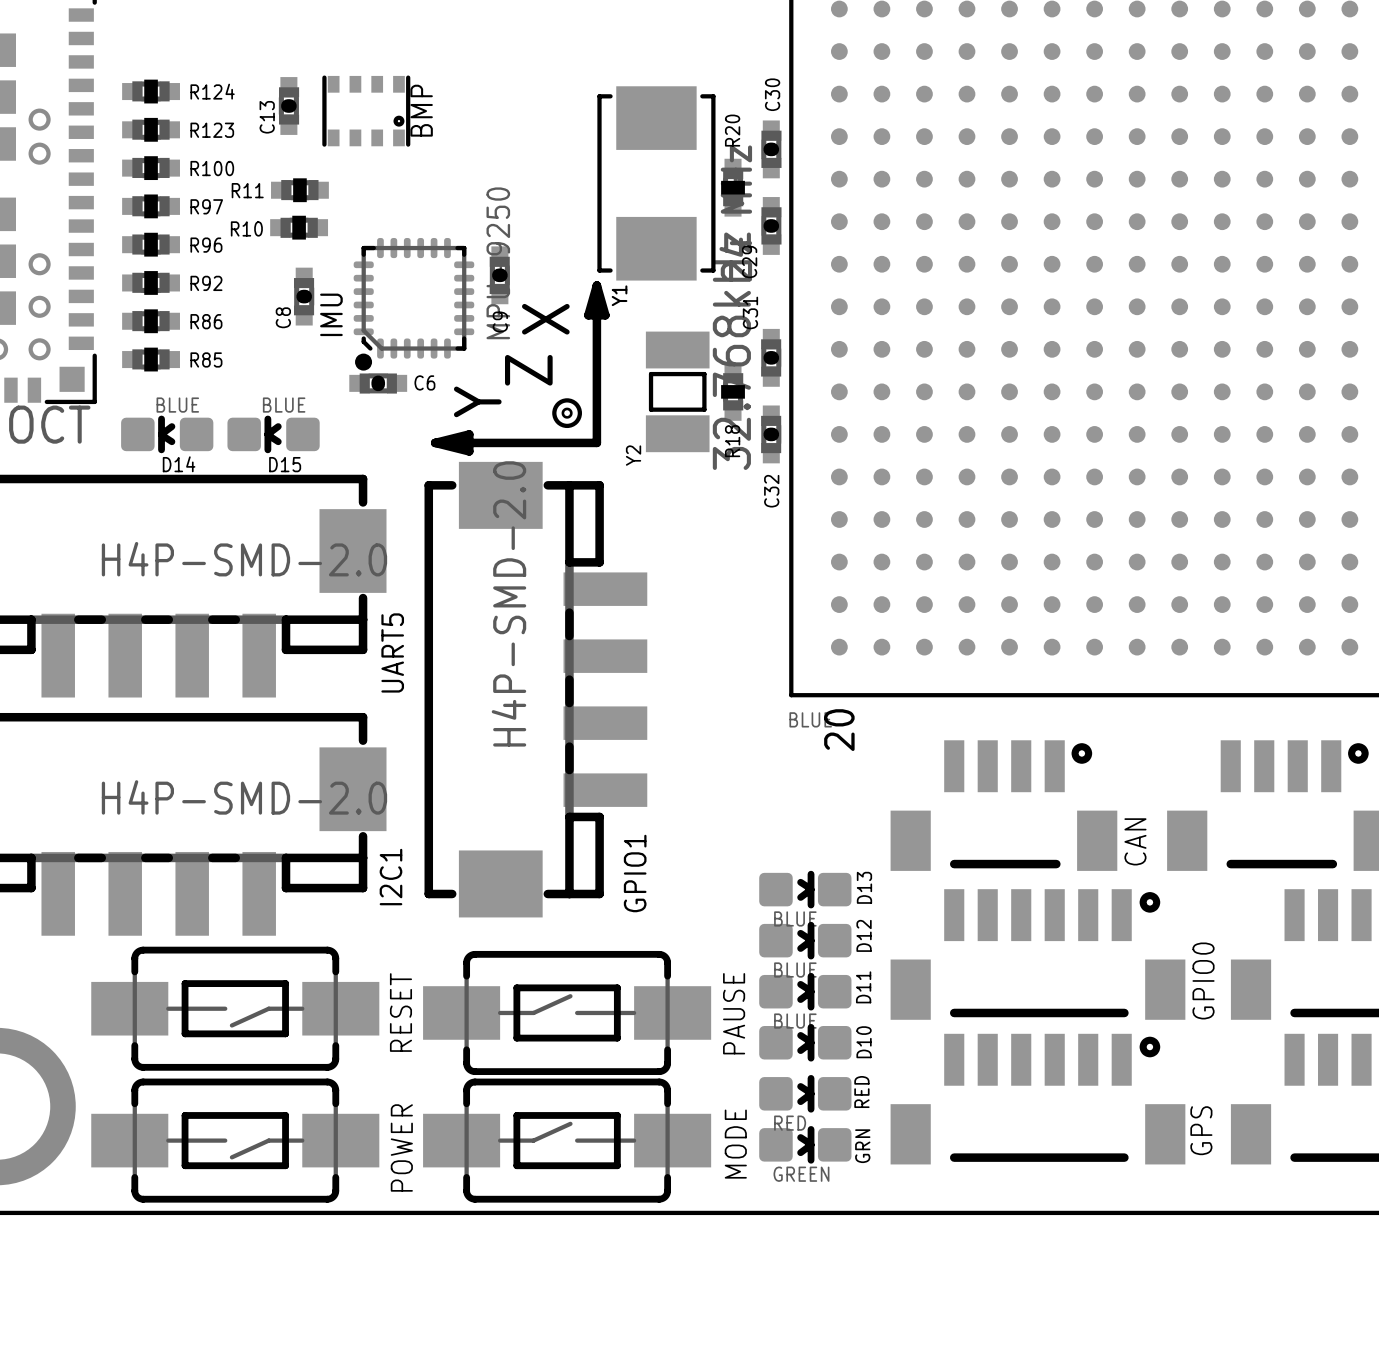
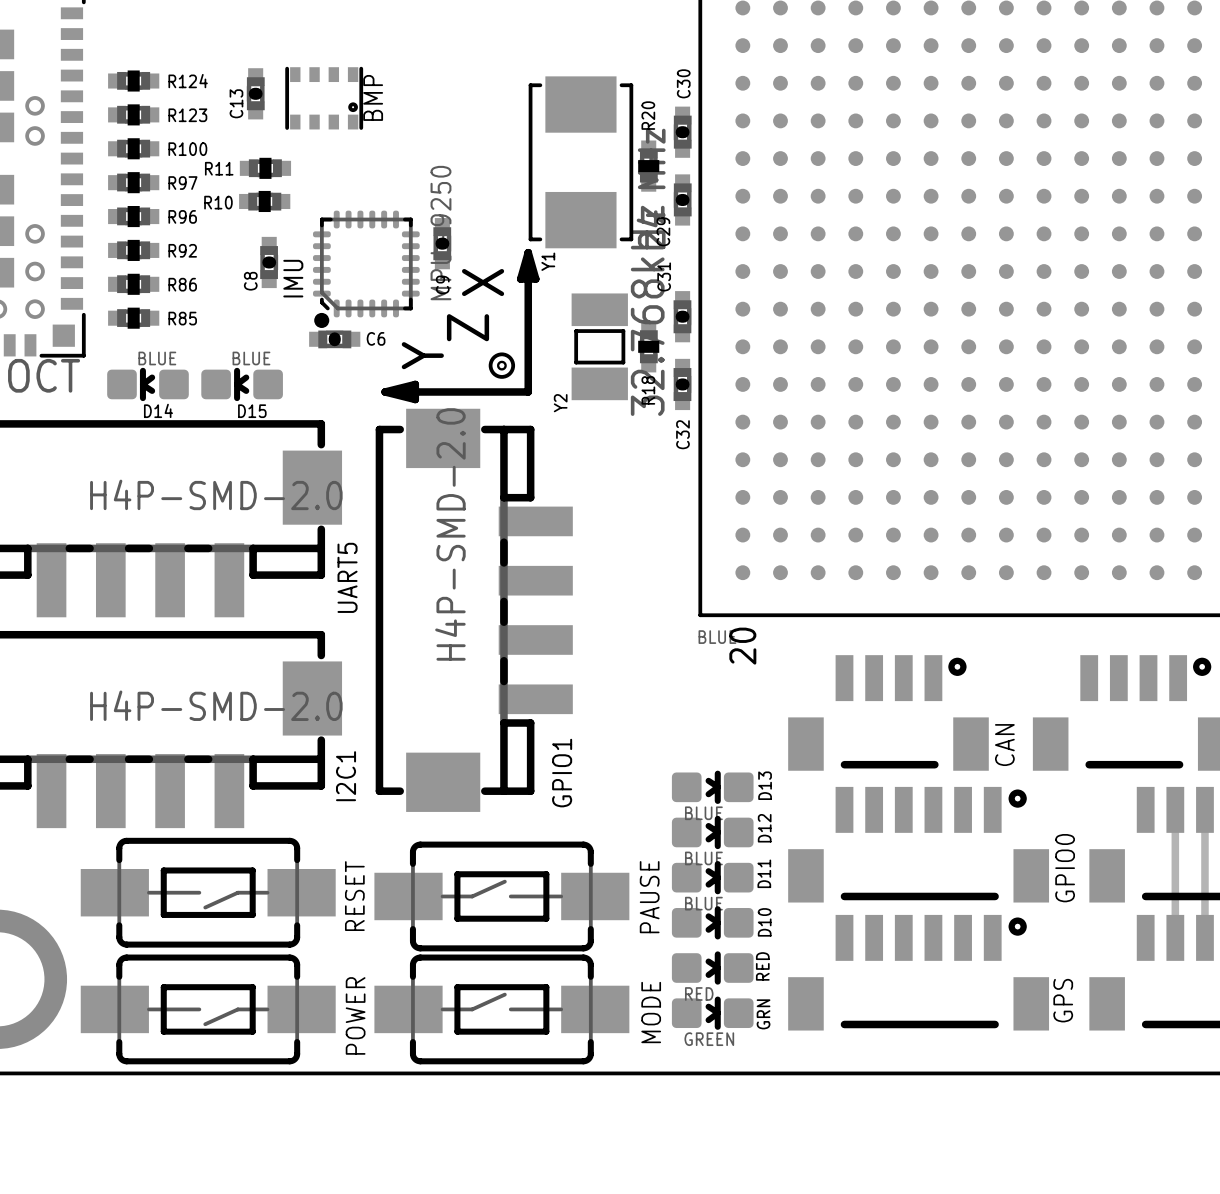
track: none -> (1175, 809) (1175, 937)
track: none -> (1204, 809) (1204, 937)

